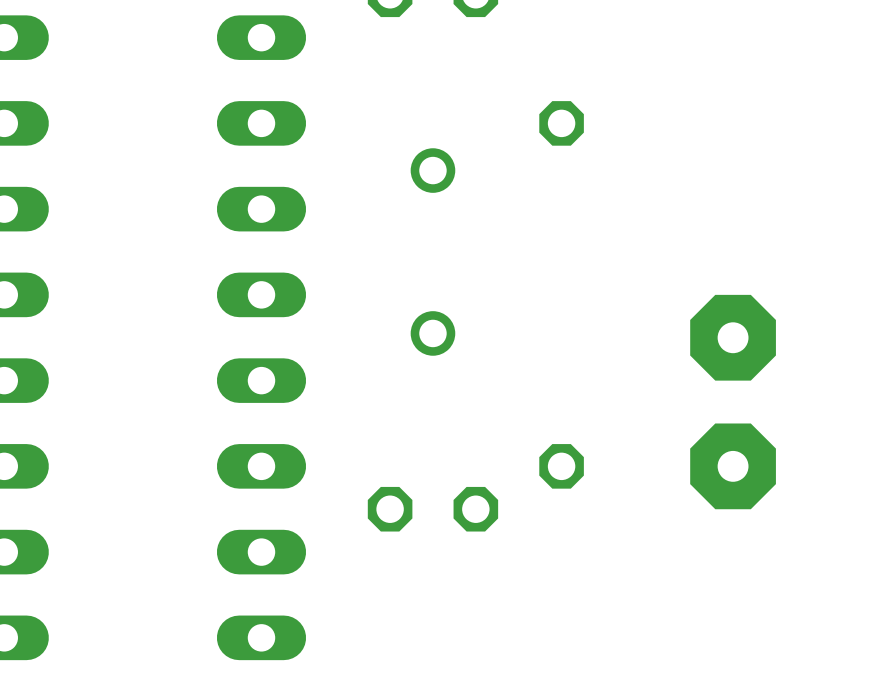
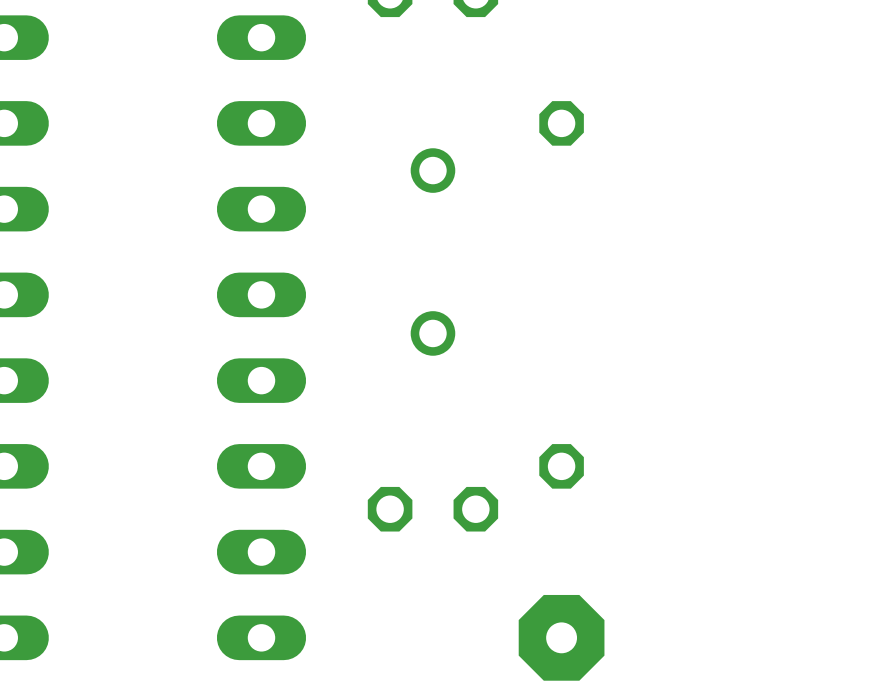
part: (733, 337) -> none
part: (733, 466) -> none
part: none -> (561, 637)

